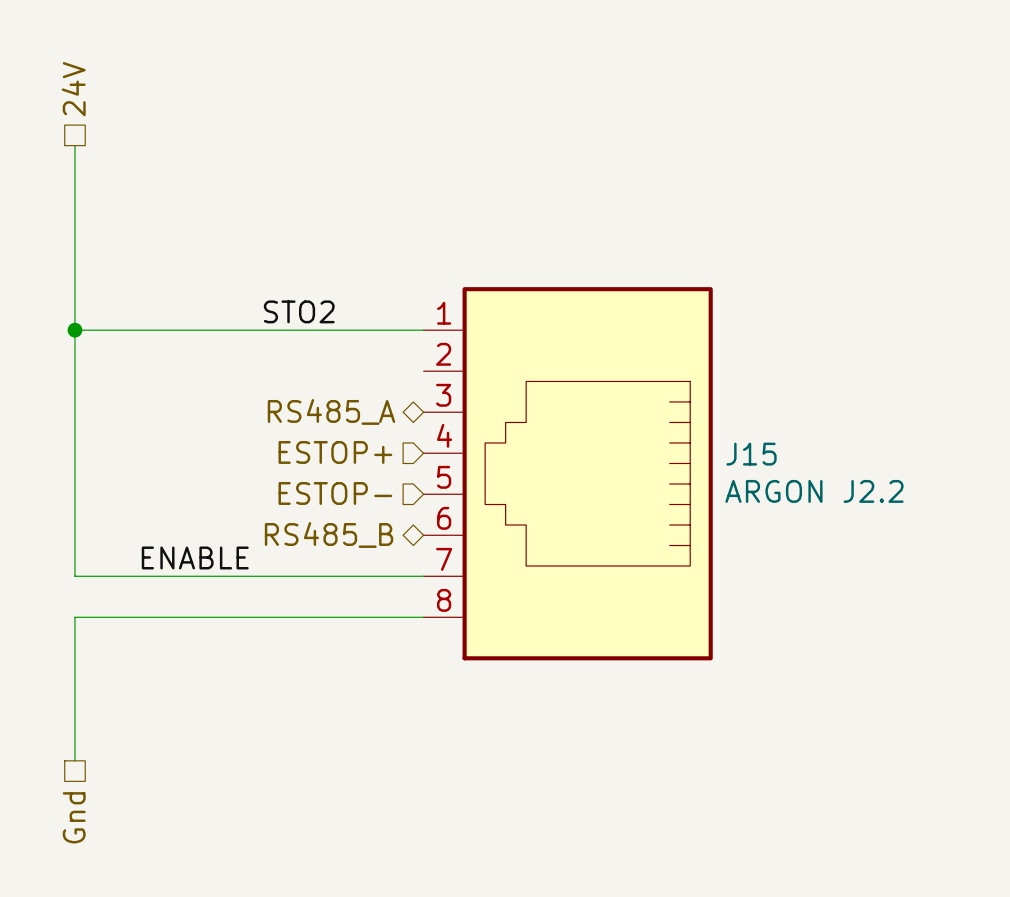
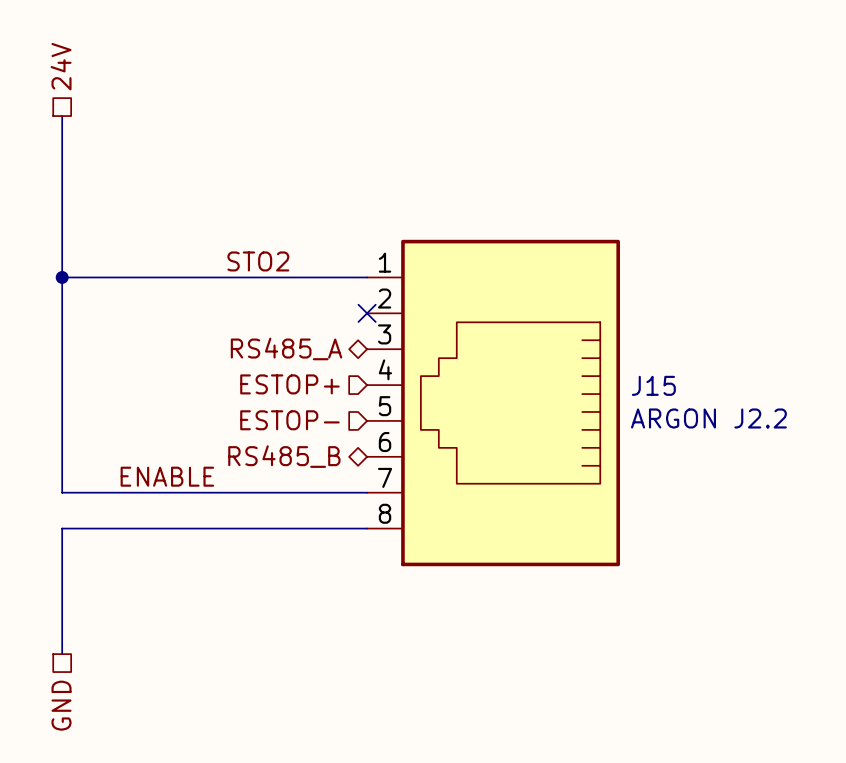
no-connect mark: none -> (367, 313)
hierarchical label: Gnd (74, 817) -> GND (61, 705)

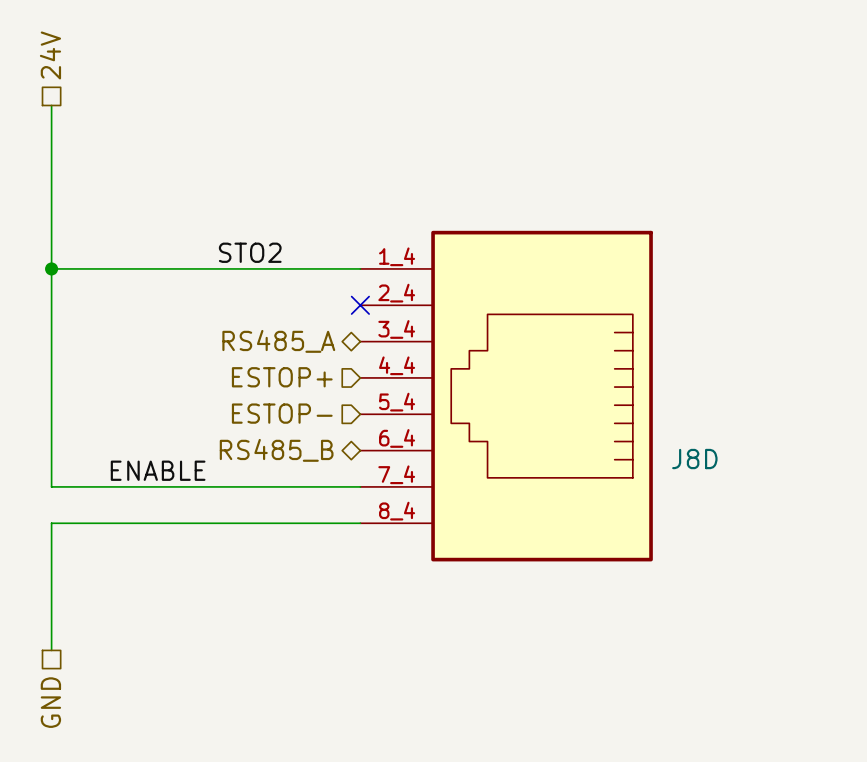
J15: ARGON J2.2 (493, 403) -> none
J8D: none -> (506, 396)

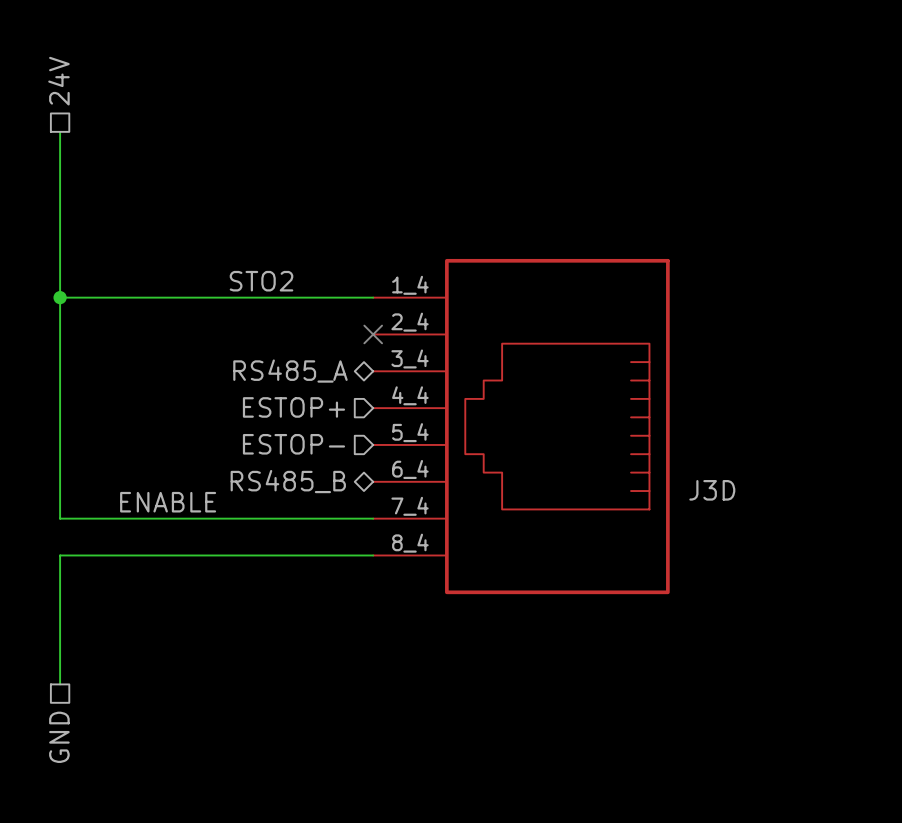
J8D name: J8D (694, 459) -> J3D (712, 490)

